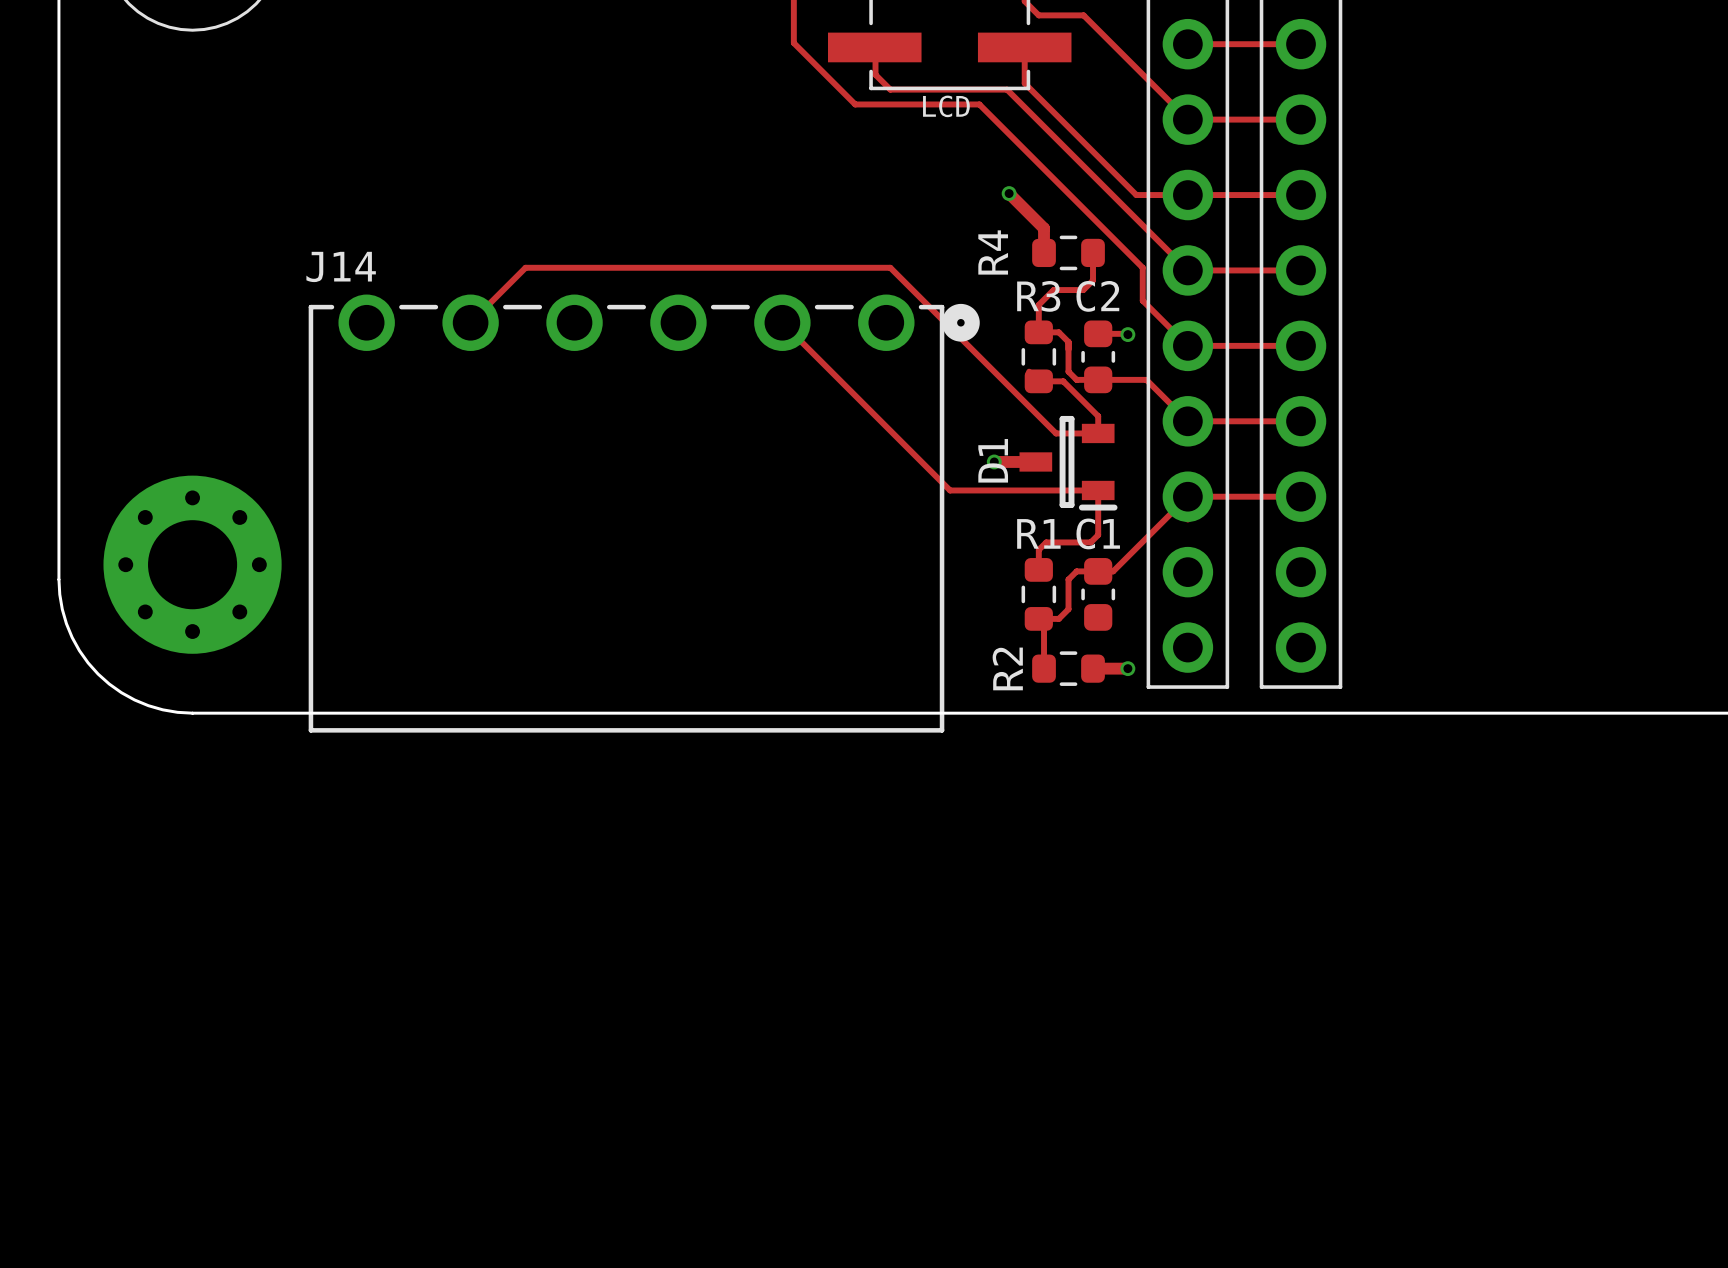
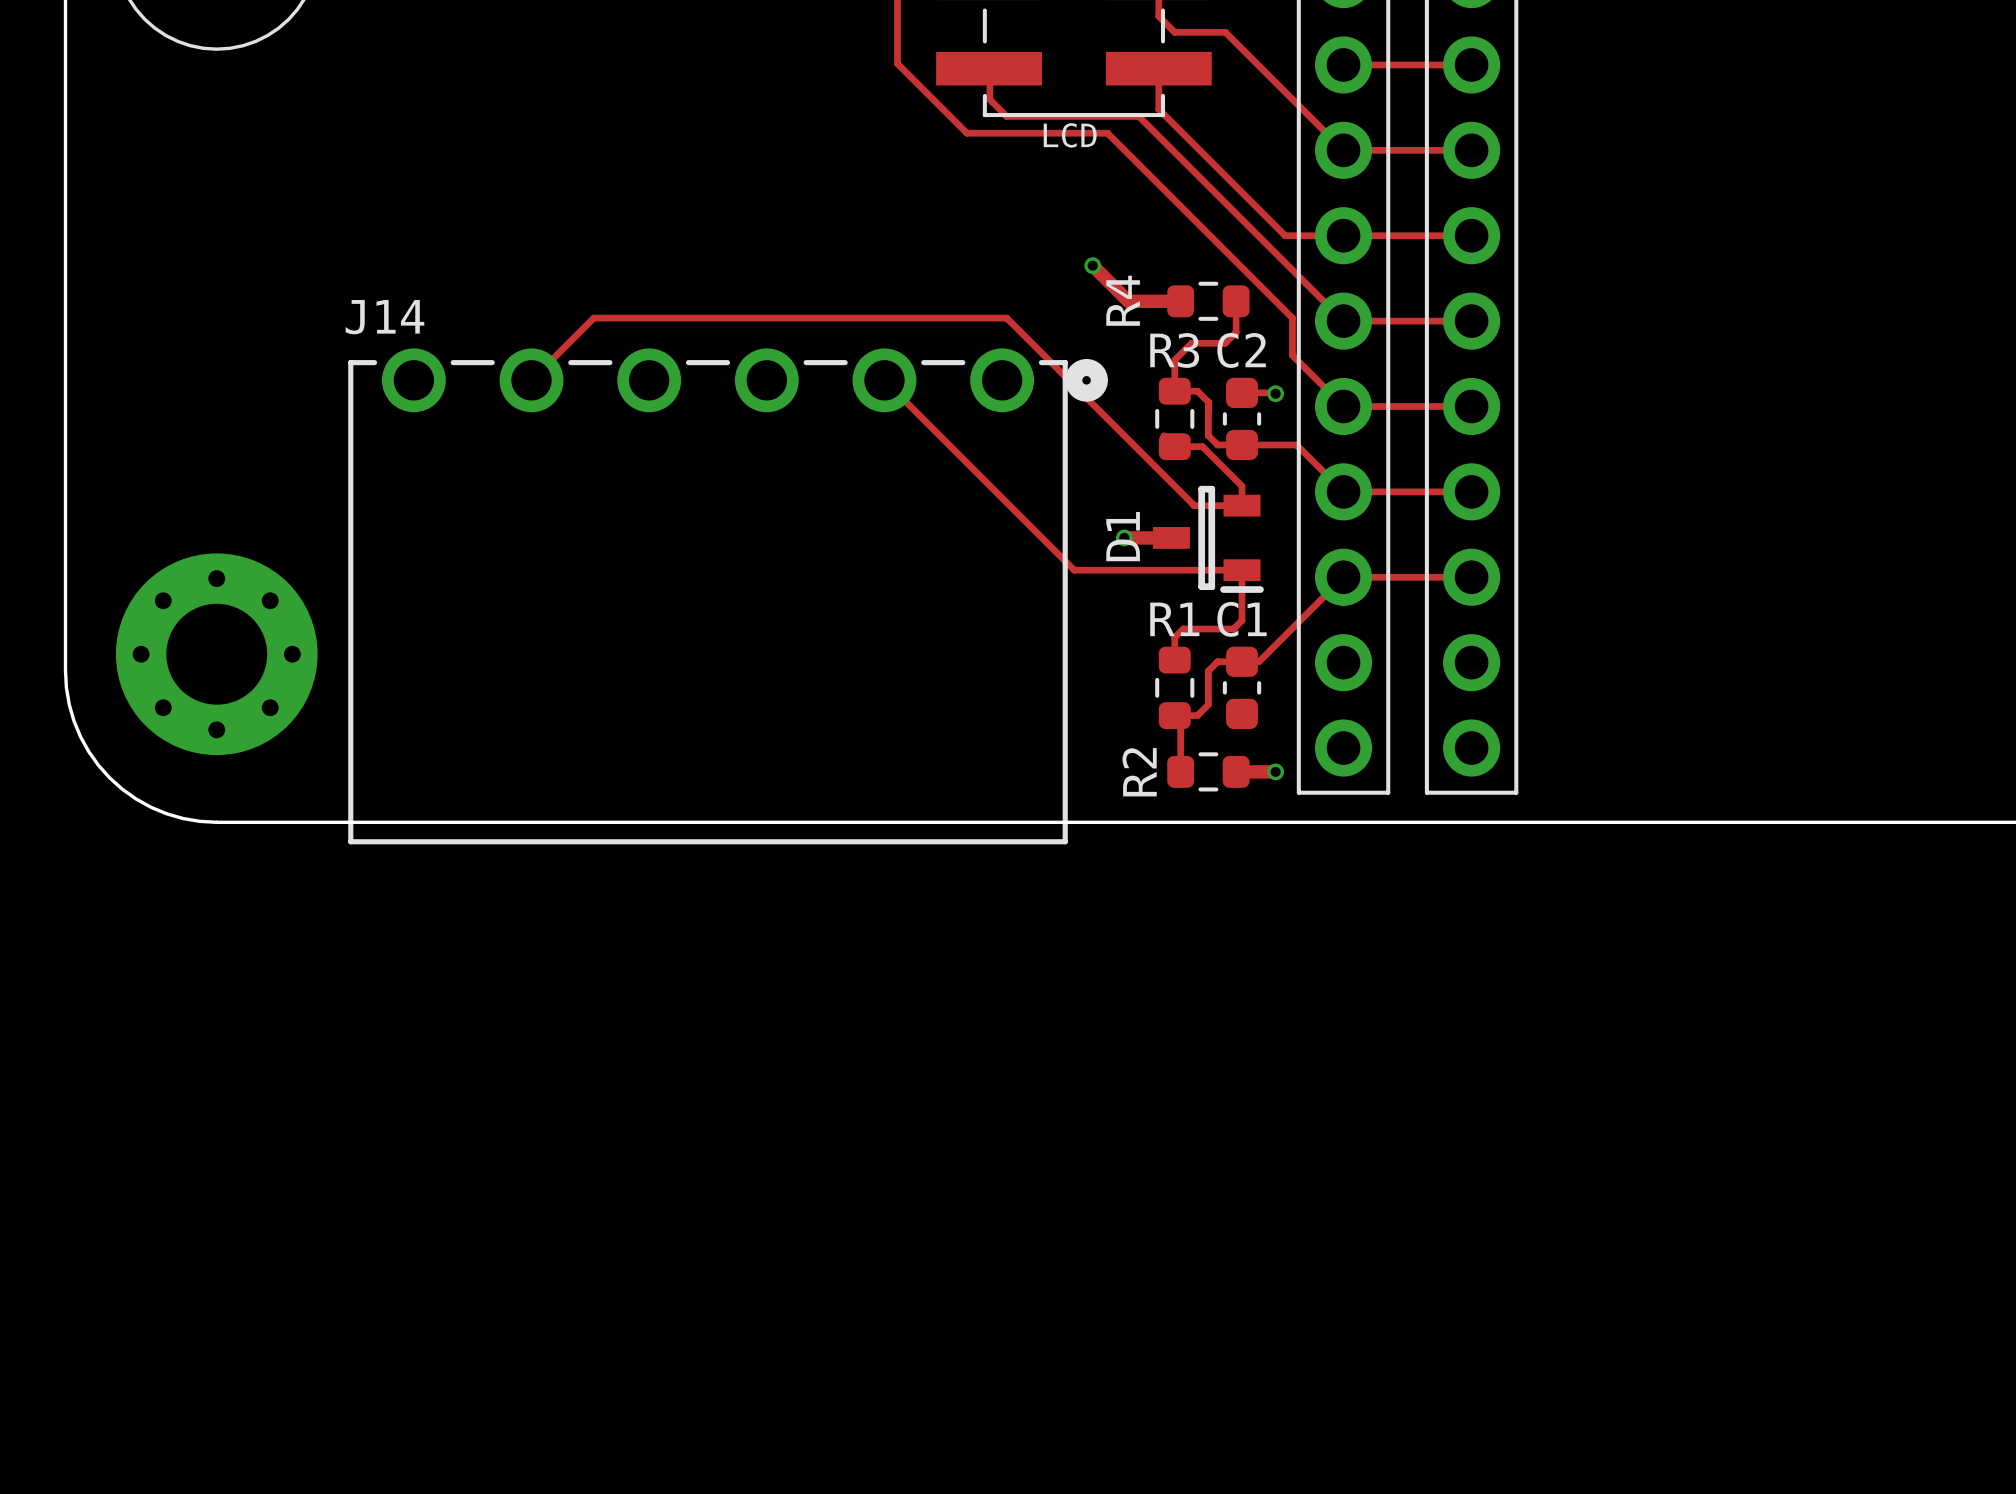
track: (1009, 193) (1044, 228) (1044, 252) -> (1092, 265) (1128, 301) (1180, 301)
via position: (1009, 193) -> (1092, 265)

